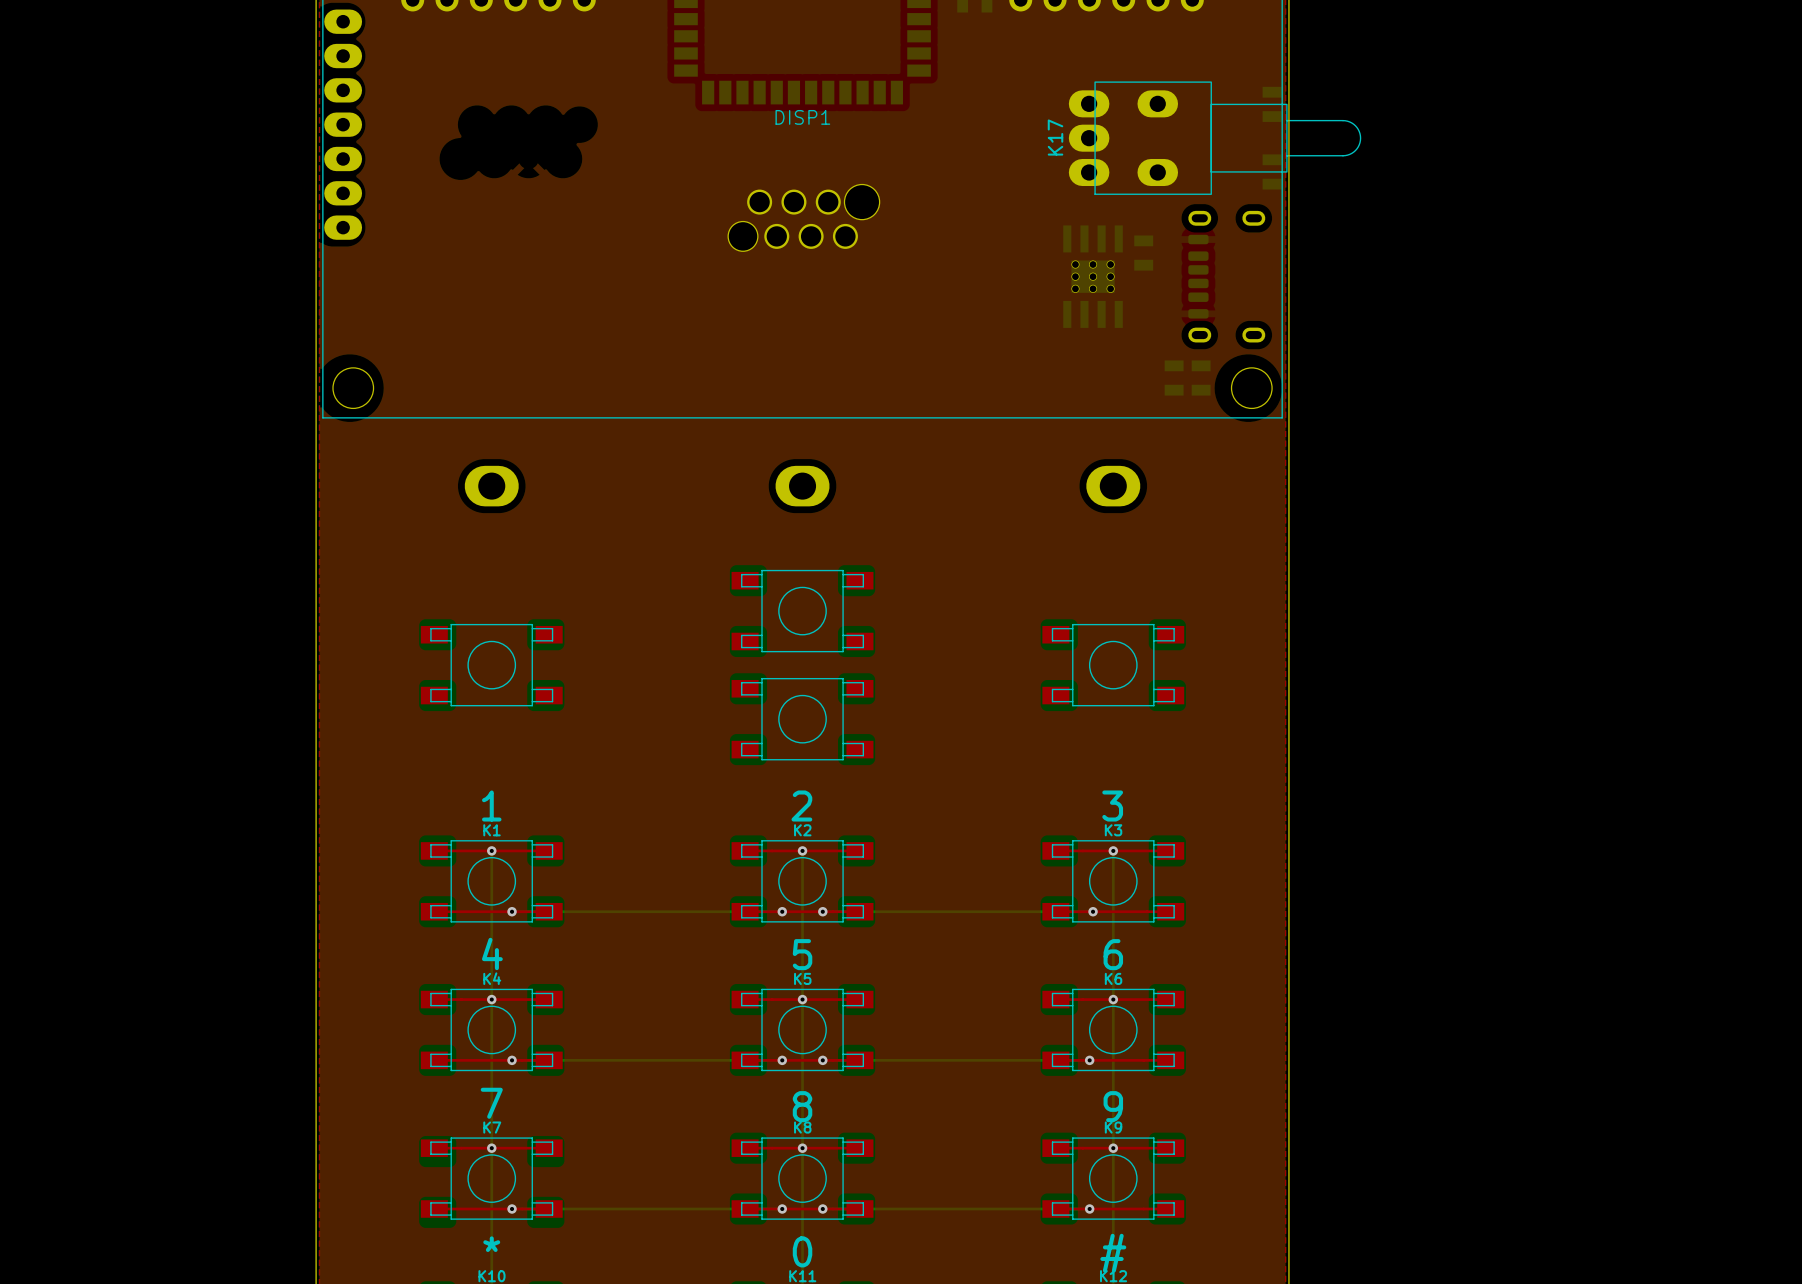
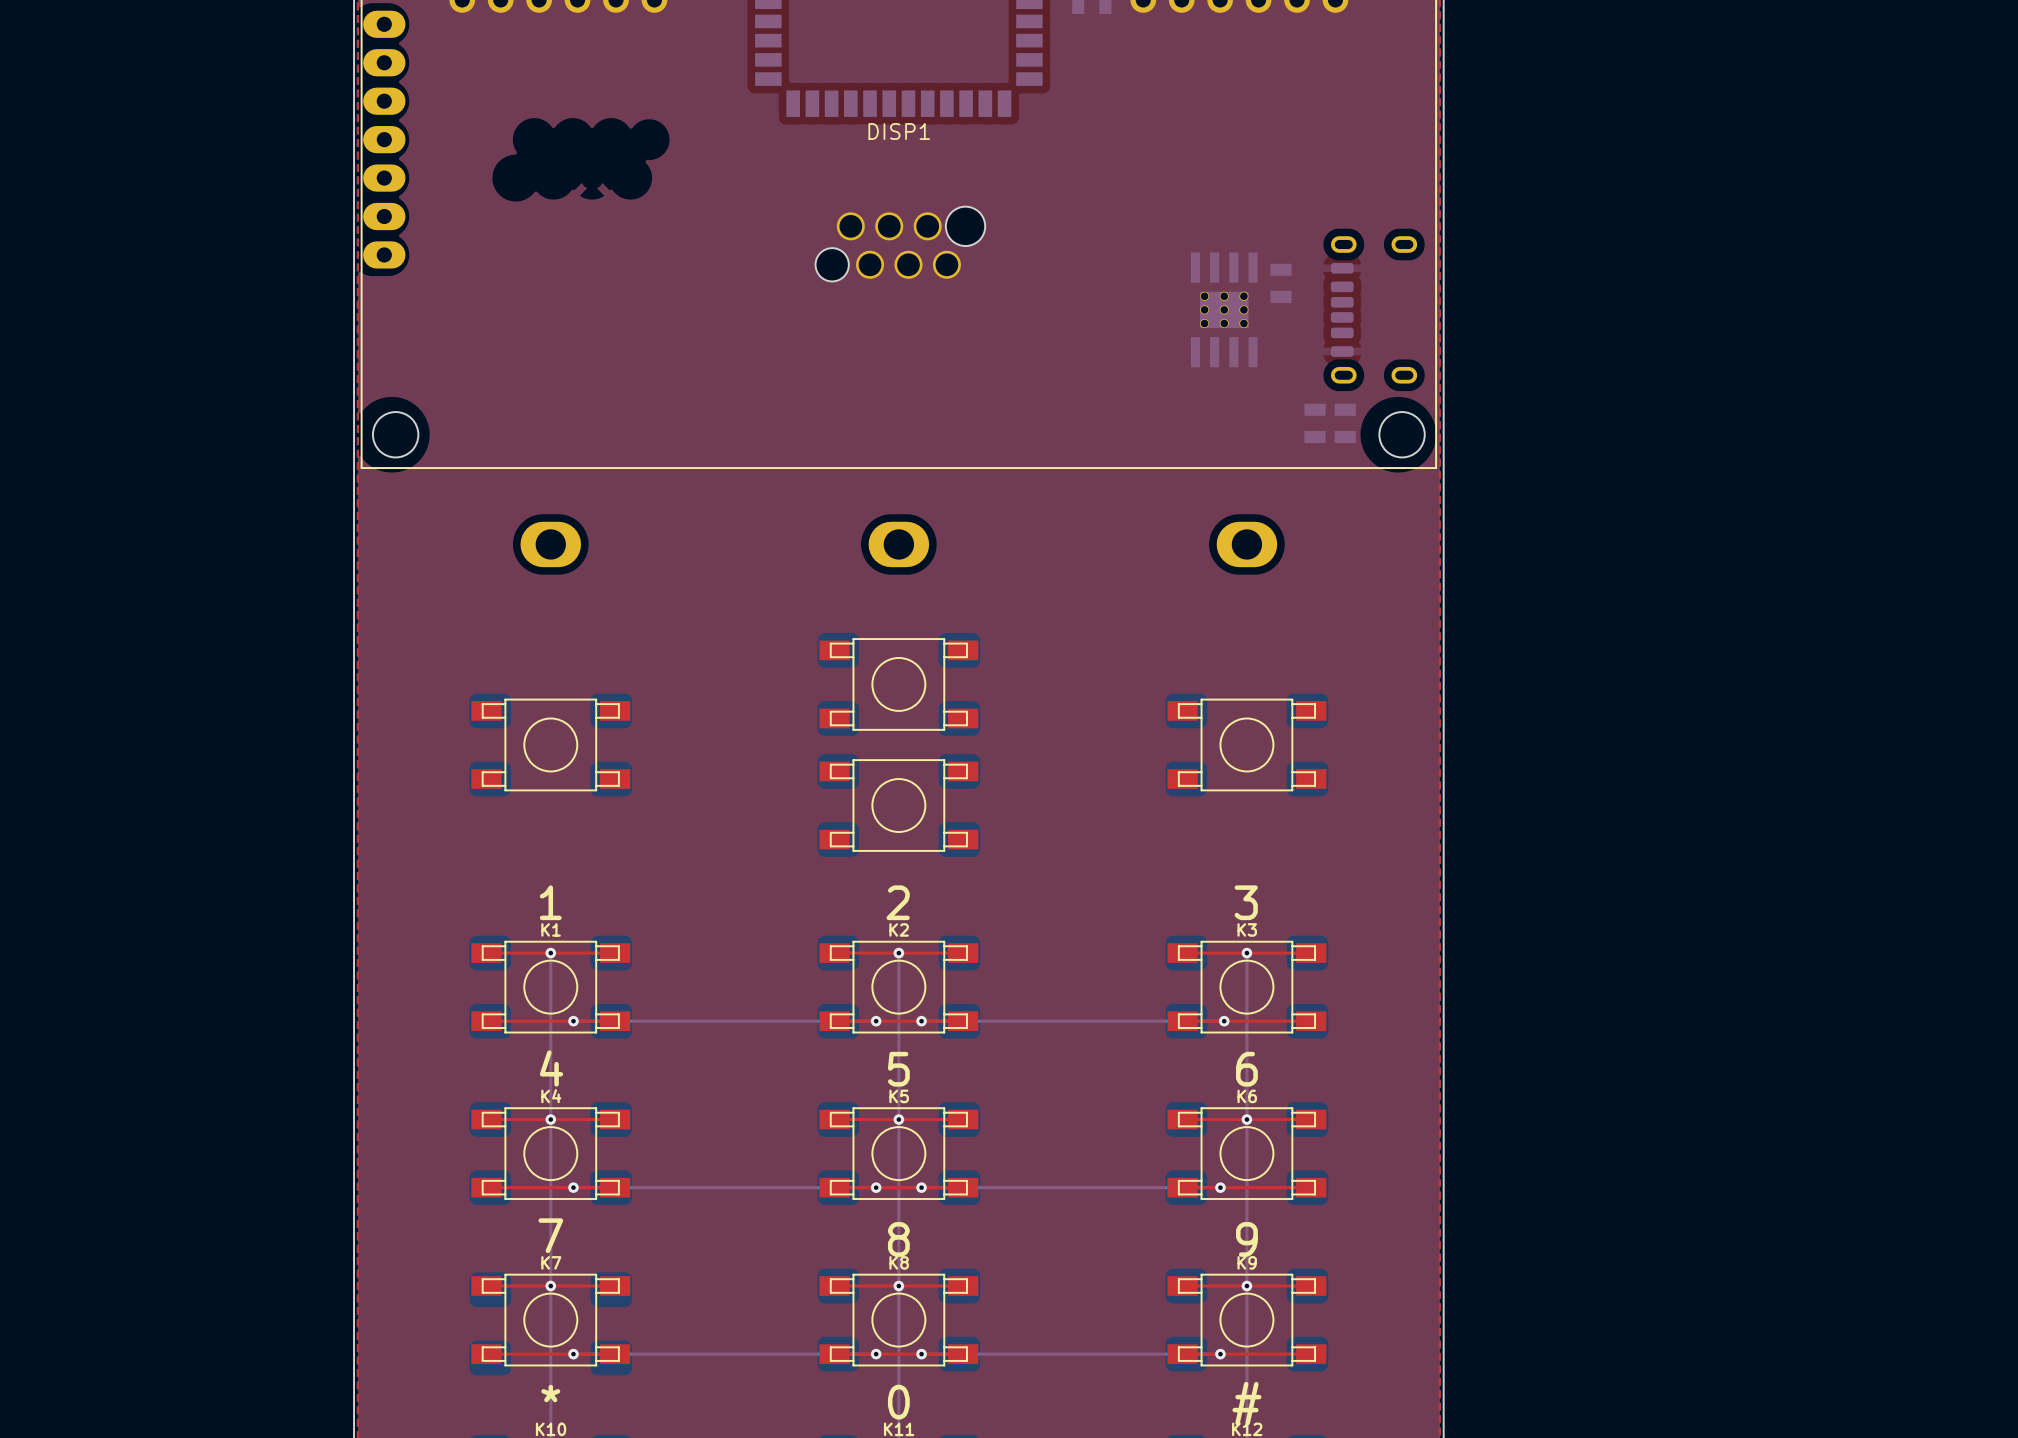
K17: (1215, 138) -> none

